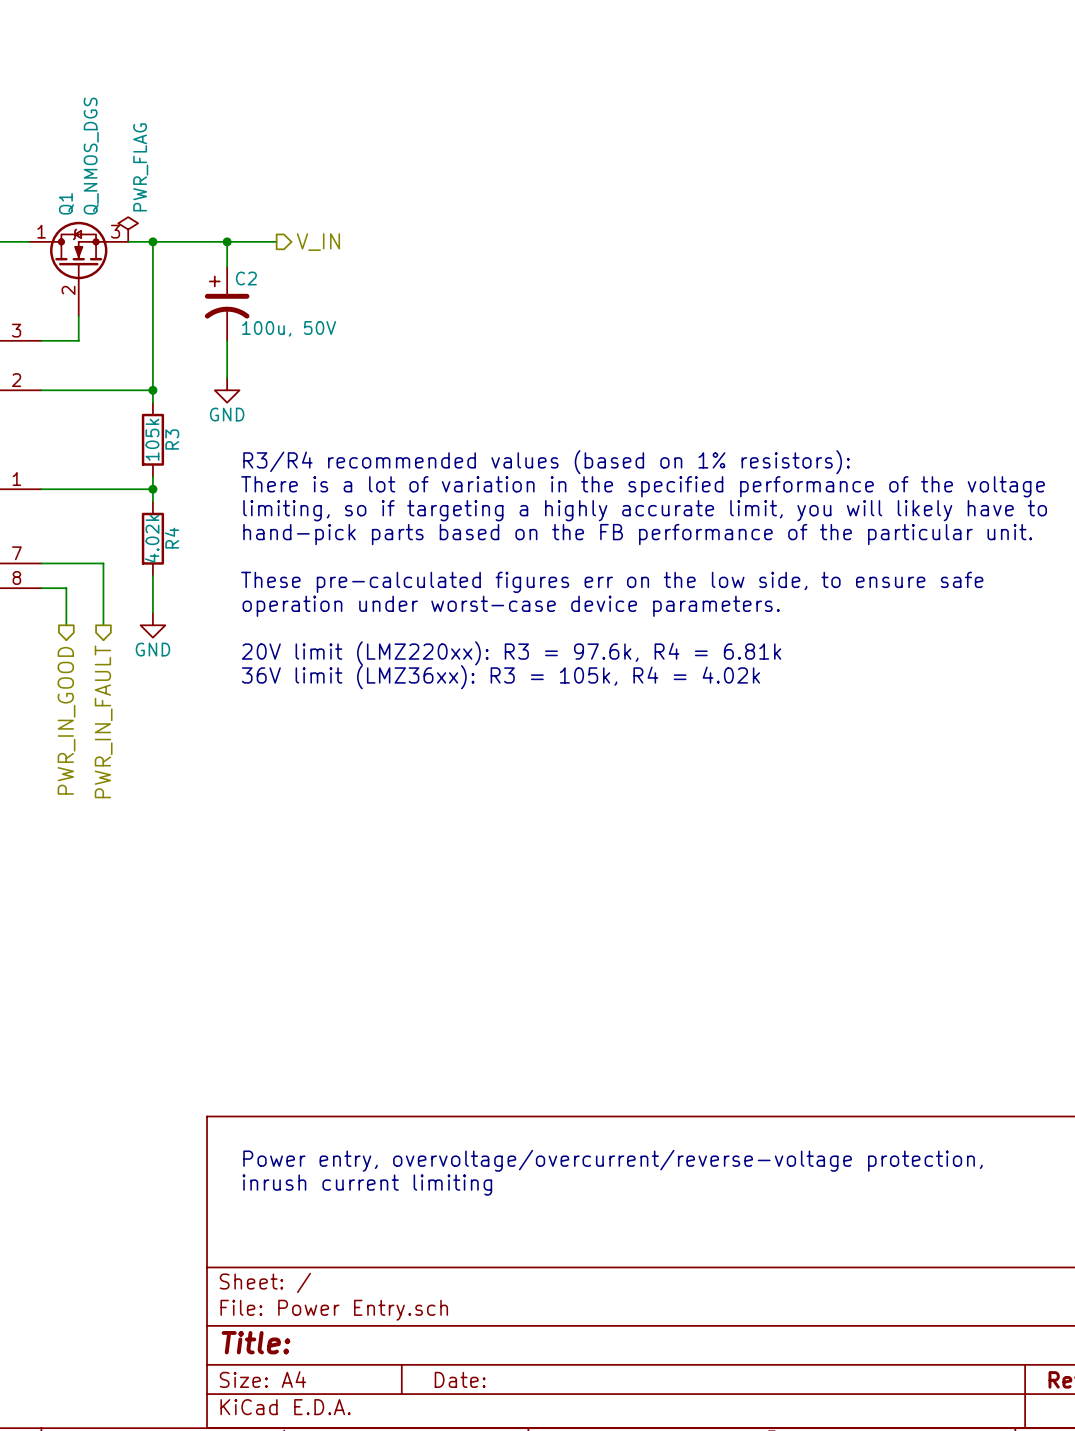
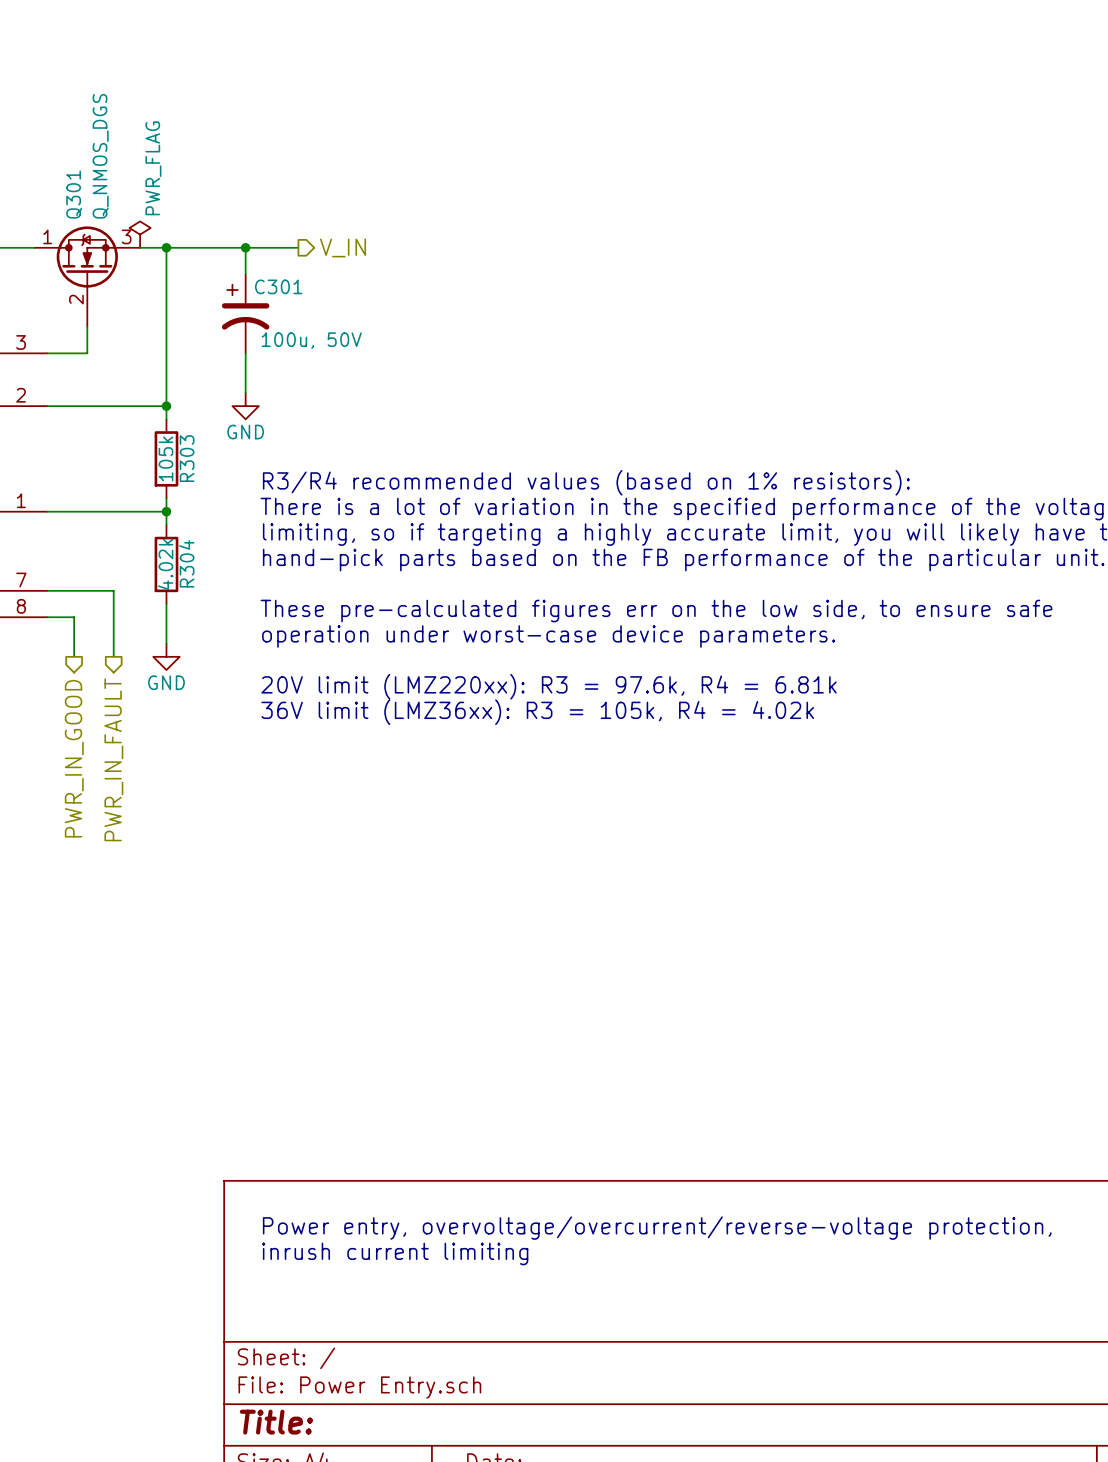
Q1 name: Q1 (66, 203) -> Q301 (74, 194)
C2 name: C2 (246, 278) -> C301 (278, 286)
R3 name: R3 (172, 439) -> R303 (187, 458)
R4 name: R4 (171, 538) -> R304 (186, 563)

